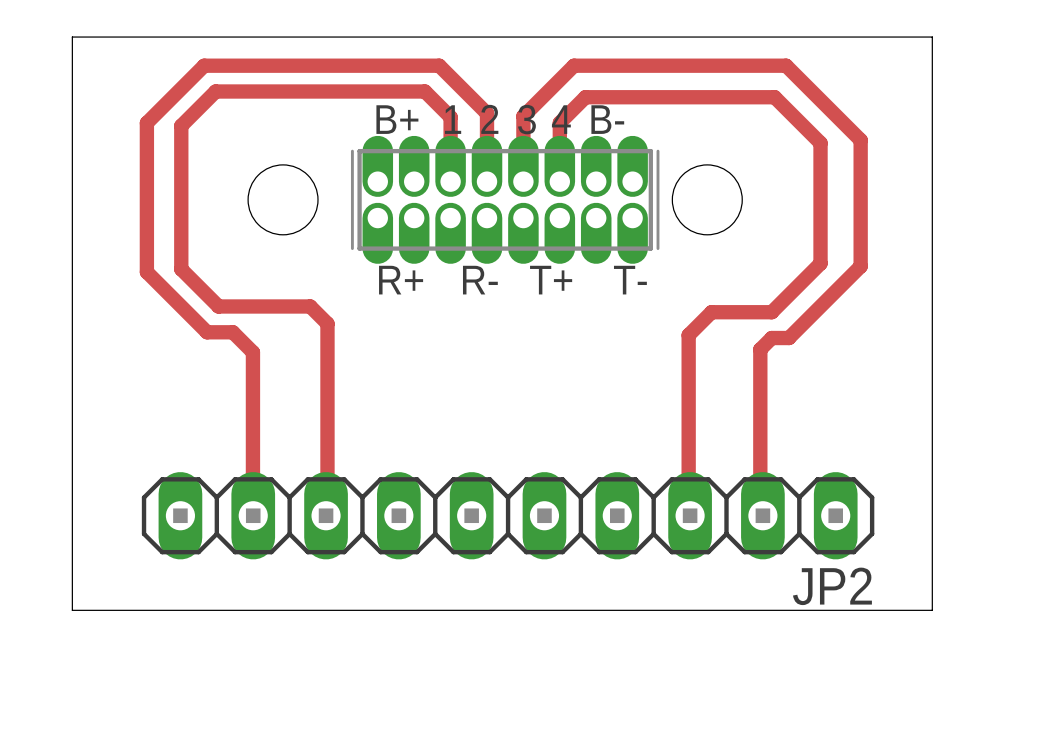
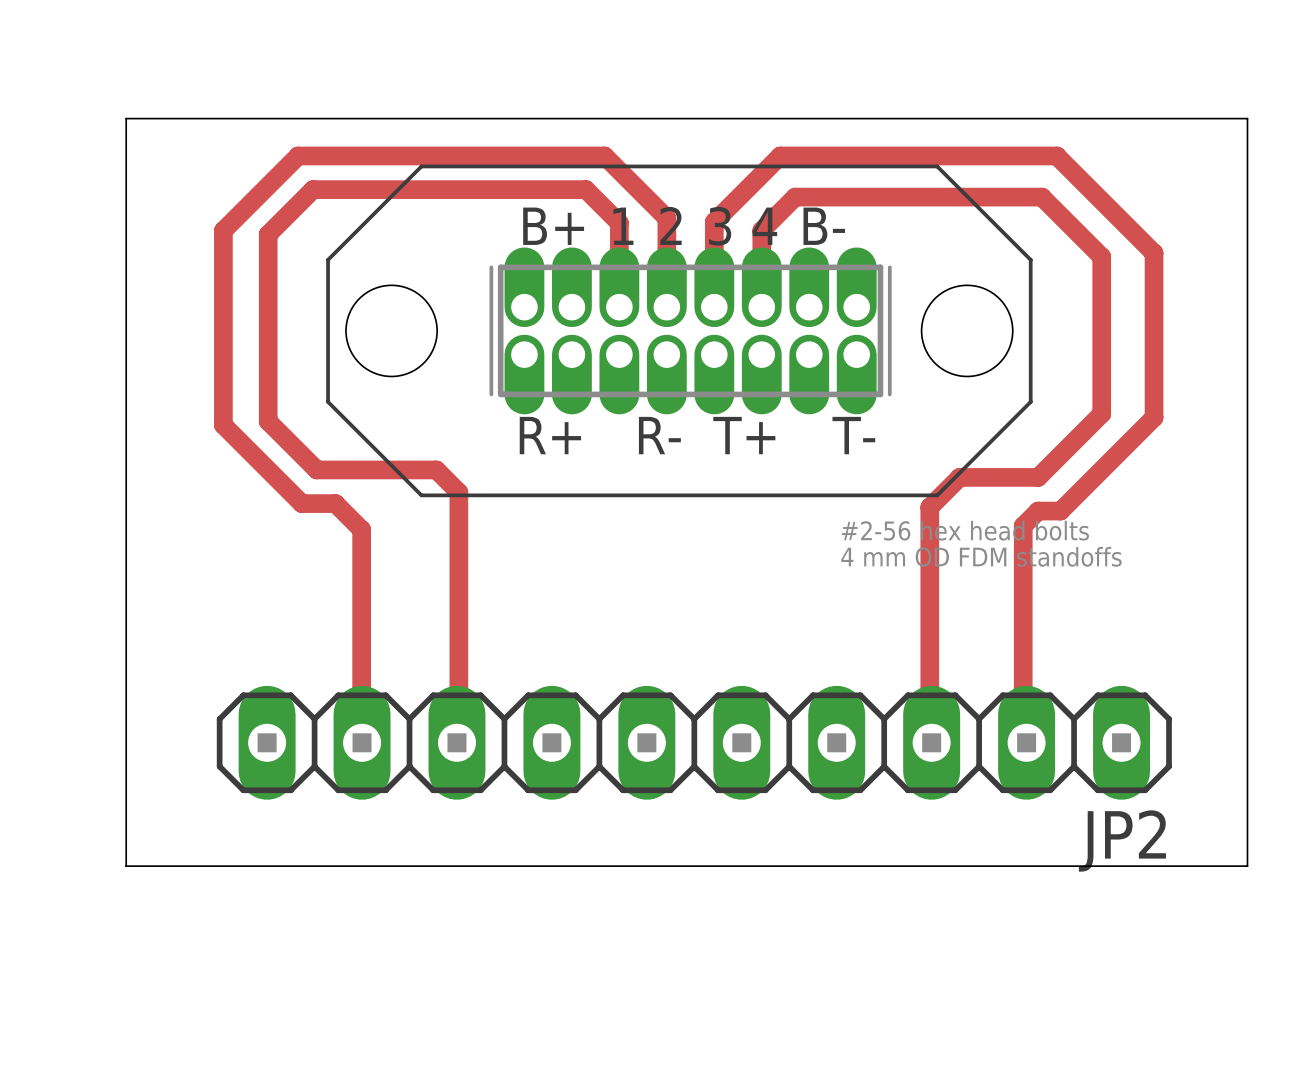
part footprint: [248, 135, 743, 264] -> [326, 164, 1033, 498]

